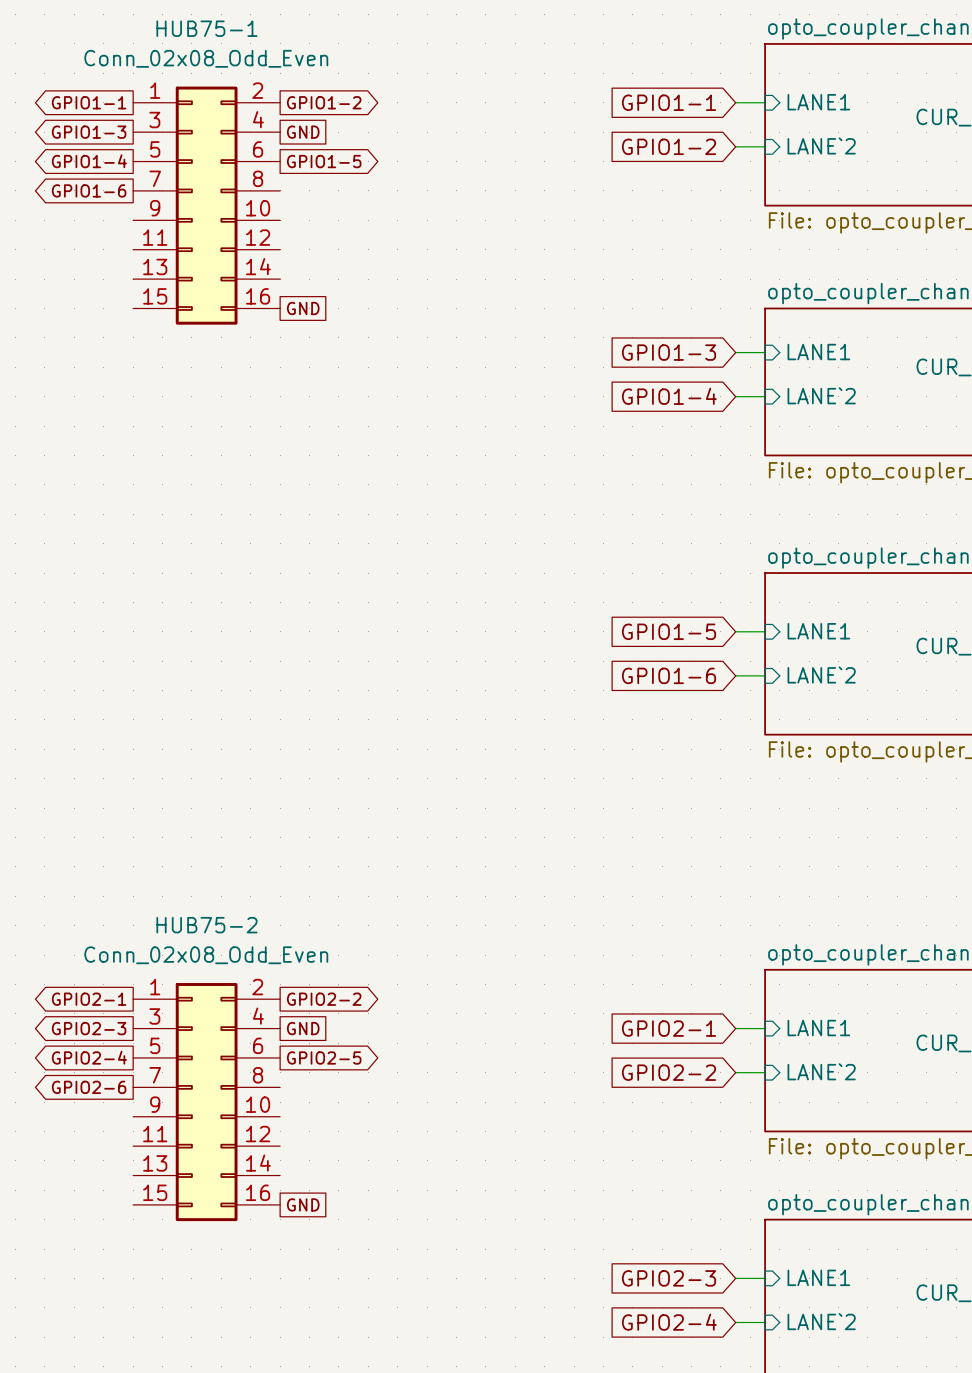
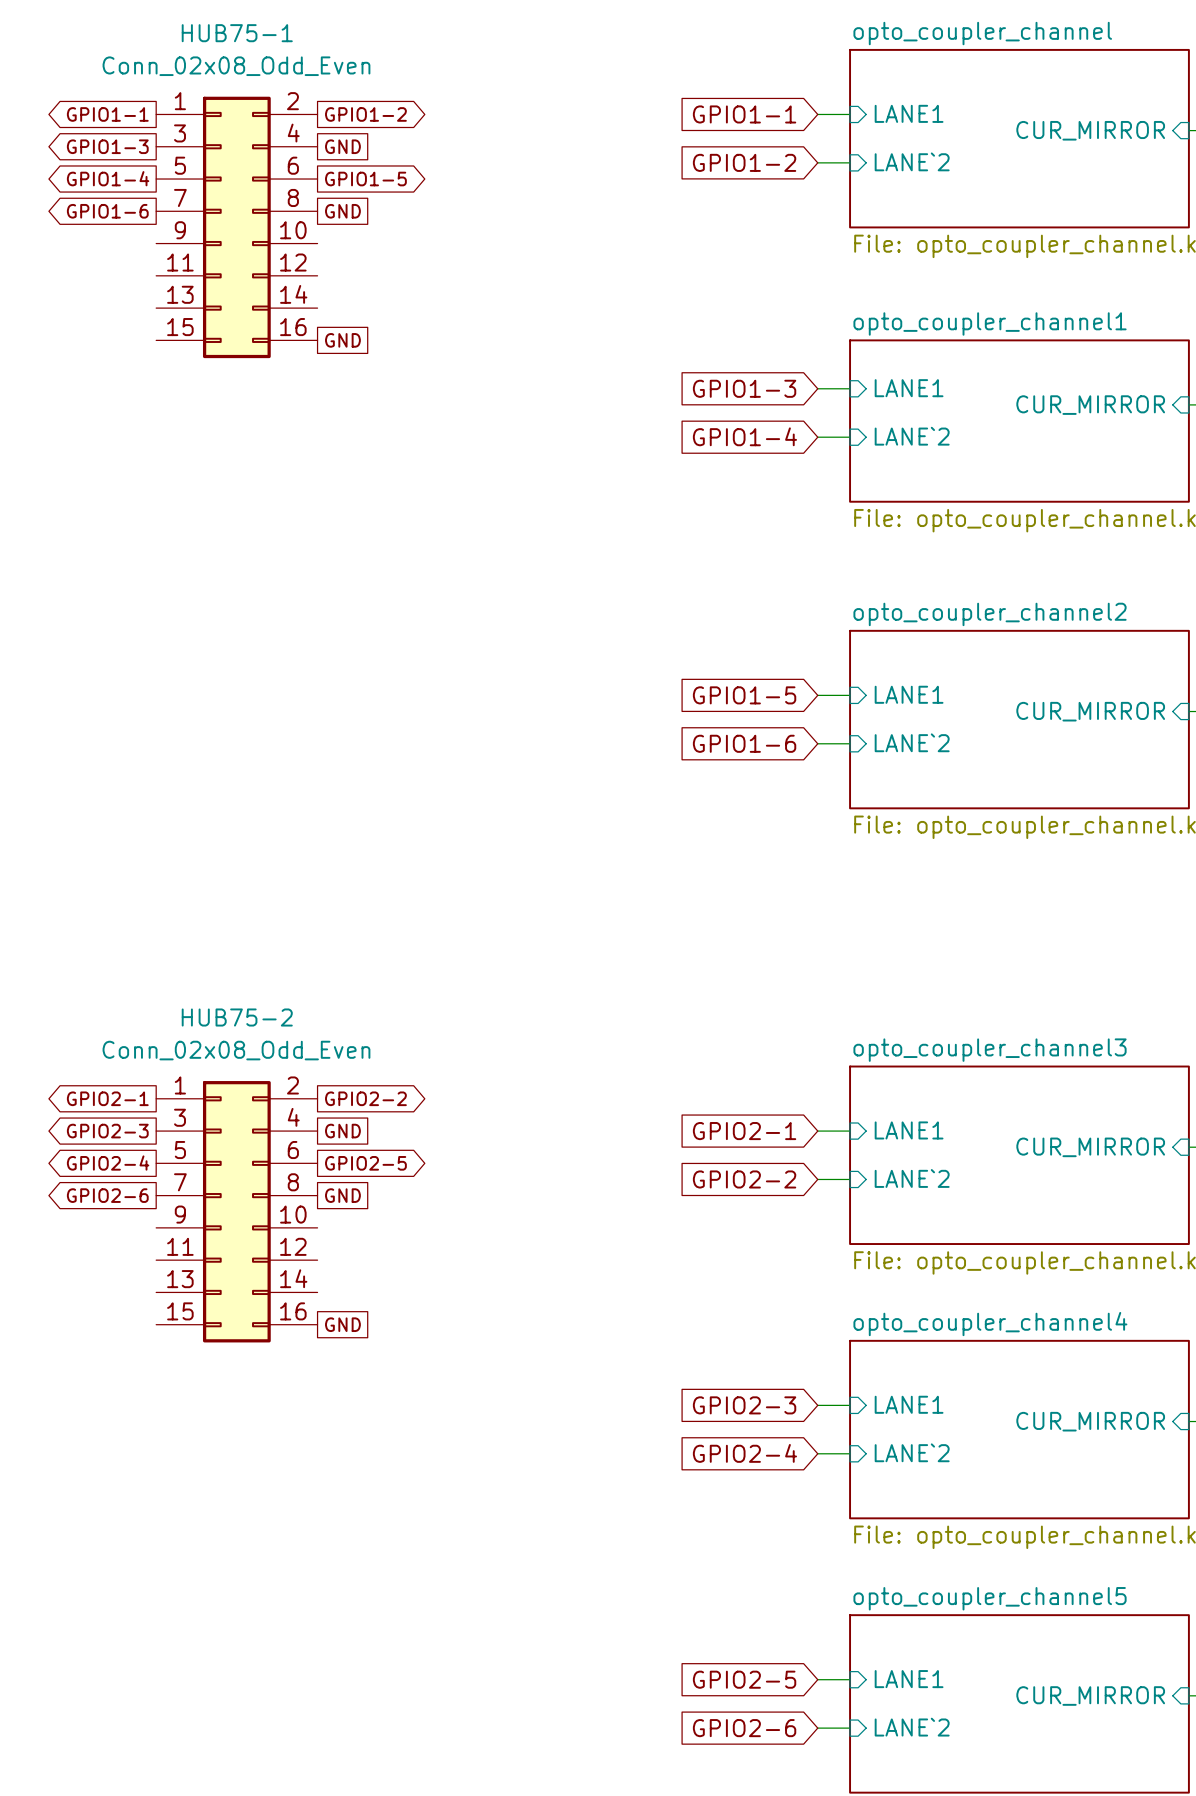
global label: none -> GND (342, 211)
global label: none -> GND (342, 1195)

